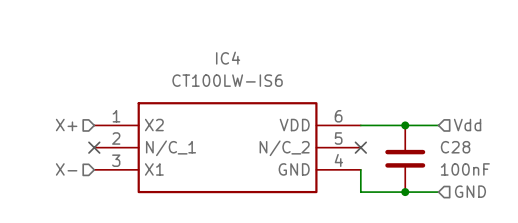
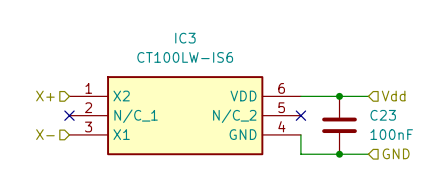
IC4 name: IC4 (228, 58) -> IC3 (185, 38)
C28 name: C28 (455, 147) -> C23 (383, 115)

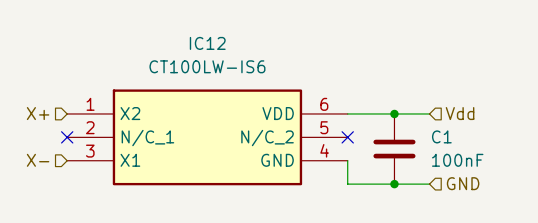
IC3 name: IC3 (185, 38) -> IC12 (207, 43)
C23 name: C23 (383, 115) -> C1 (441, 136)

